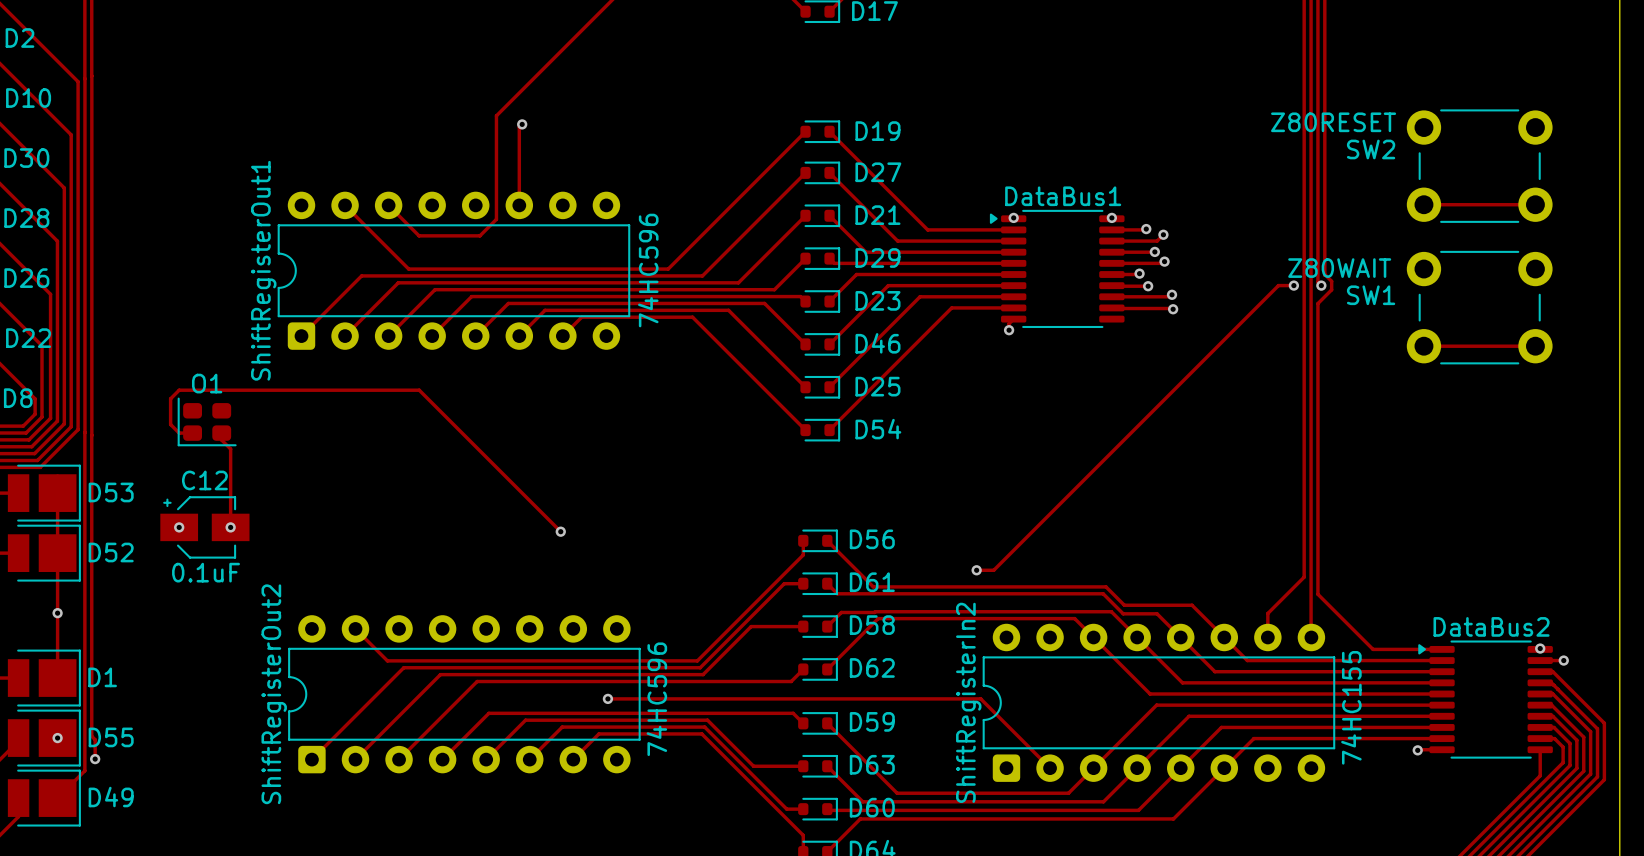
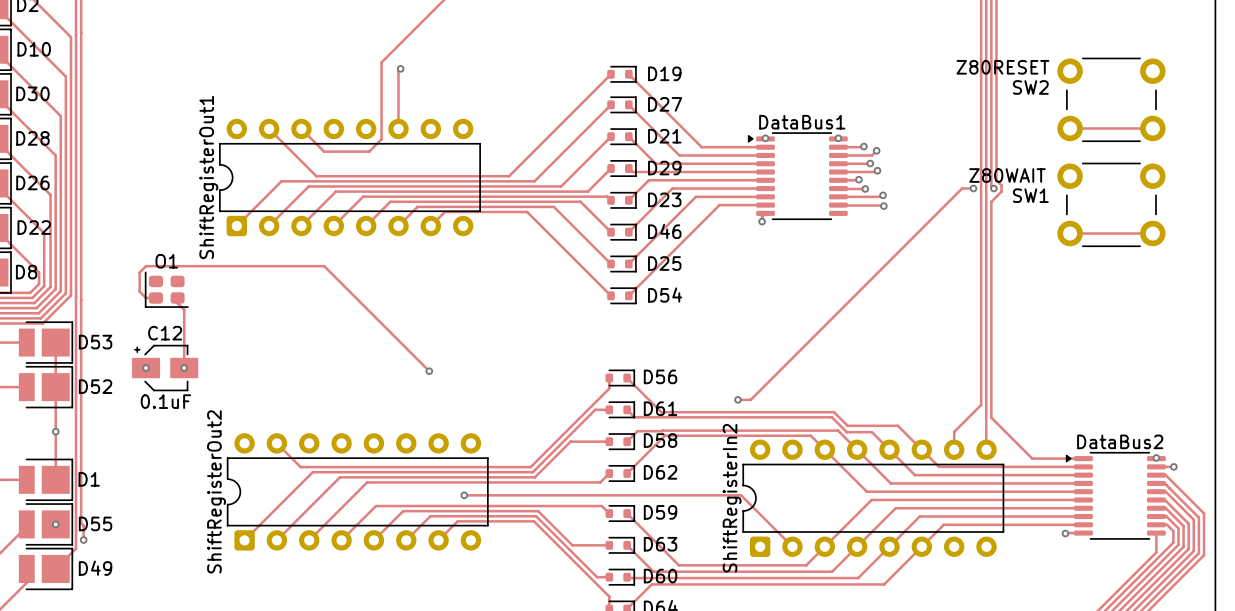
text: 74HC596 (648, 270) -> none
text: 74HC596 (656, 699) -> none
text: 74HC155 (1351, 707) -> none

